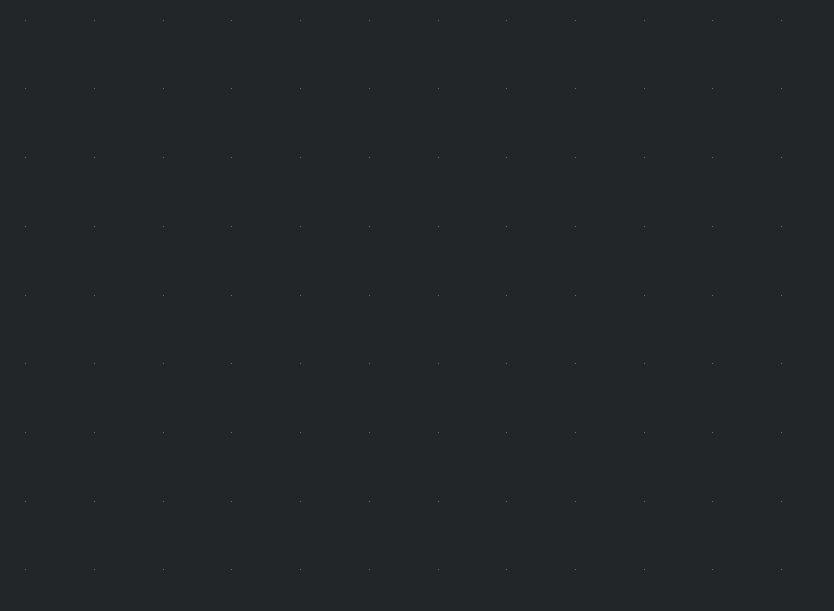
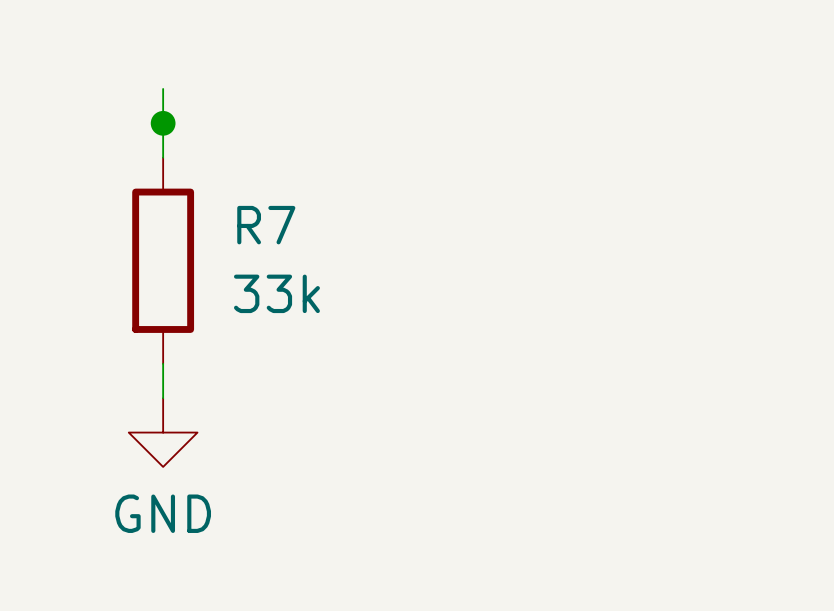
wire: none -> (163, 88) (163, 157)
junction: none -> (163, 123)
R7: none -> 33k (163, 260)
wire: none -> (163, 363) (163, 398)
power symbol: none -> GND (163, 432)

